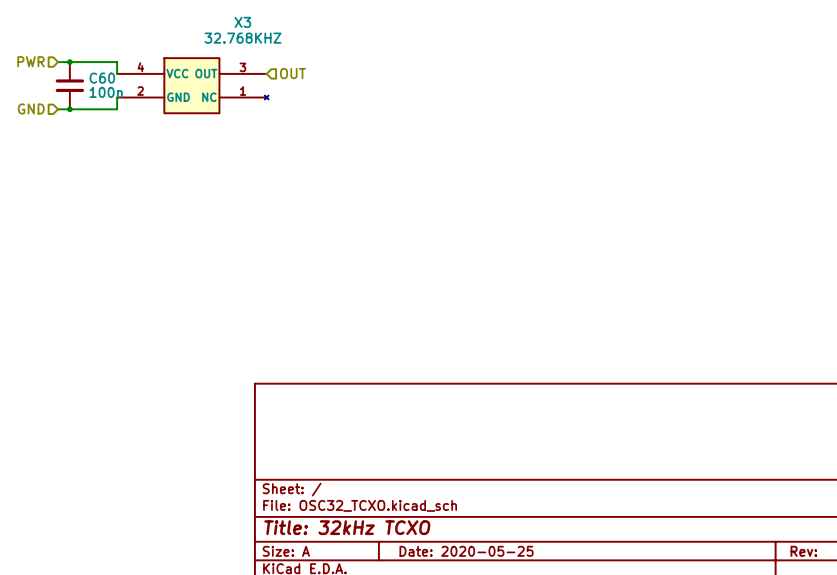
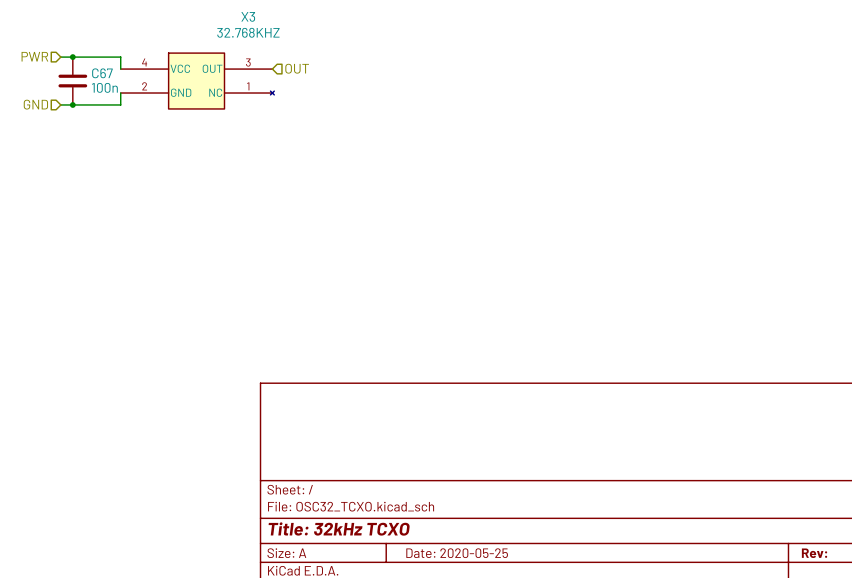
C60 name: C60 (102, 78) -> C67 (102, 73)

